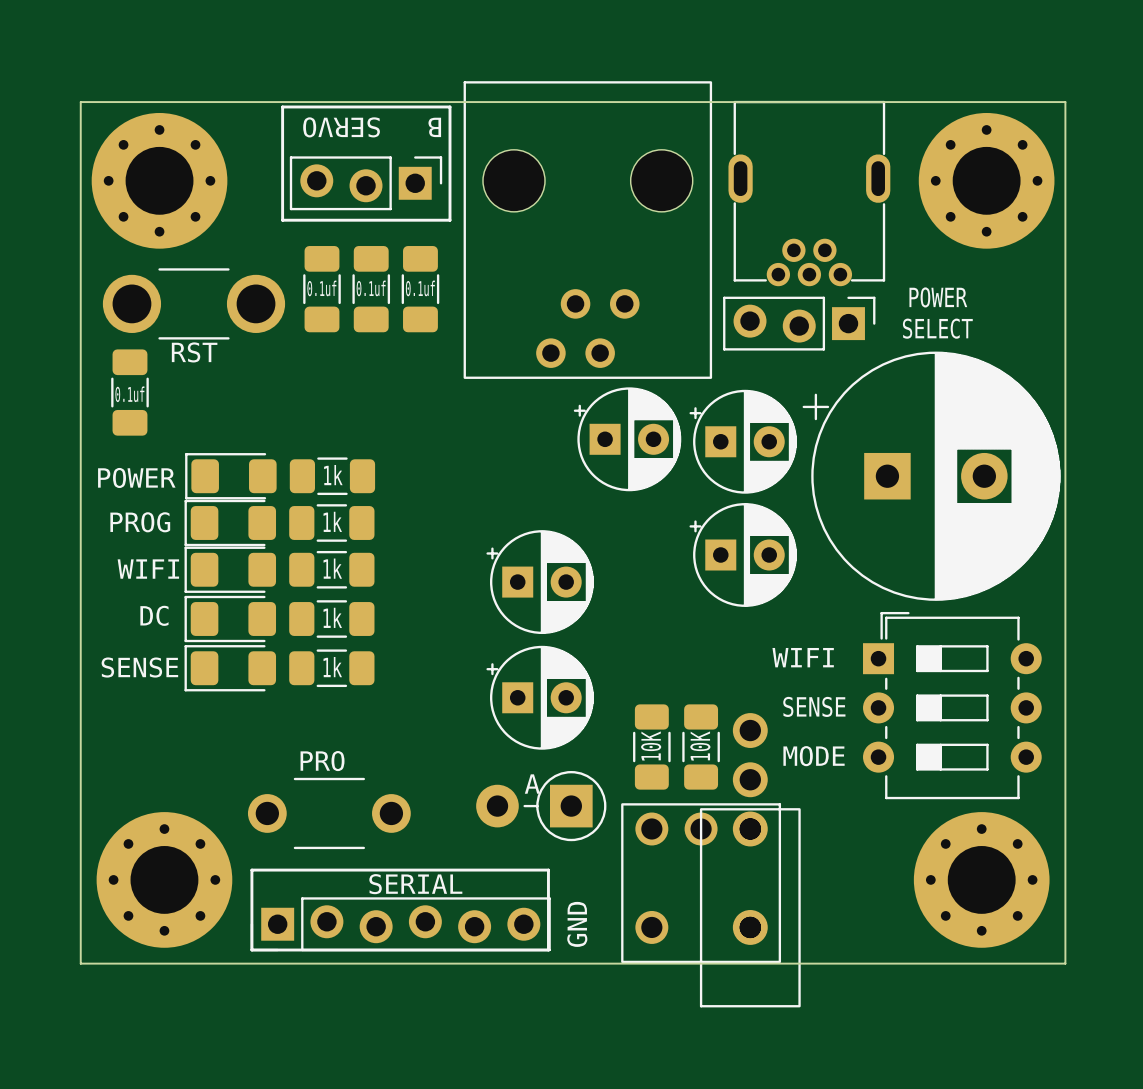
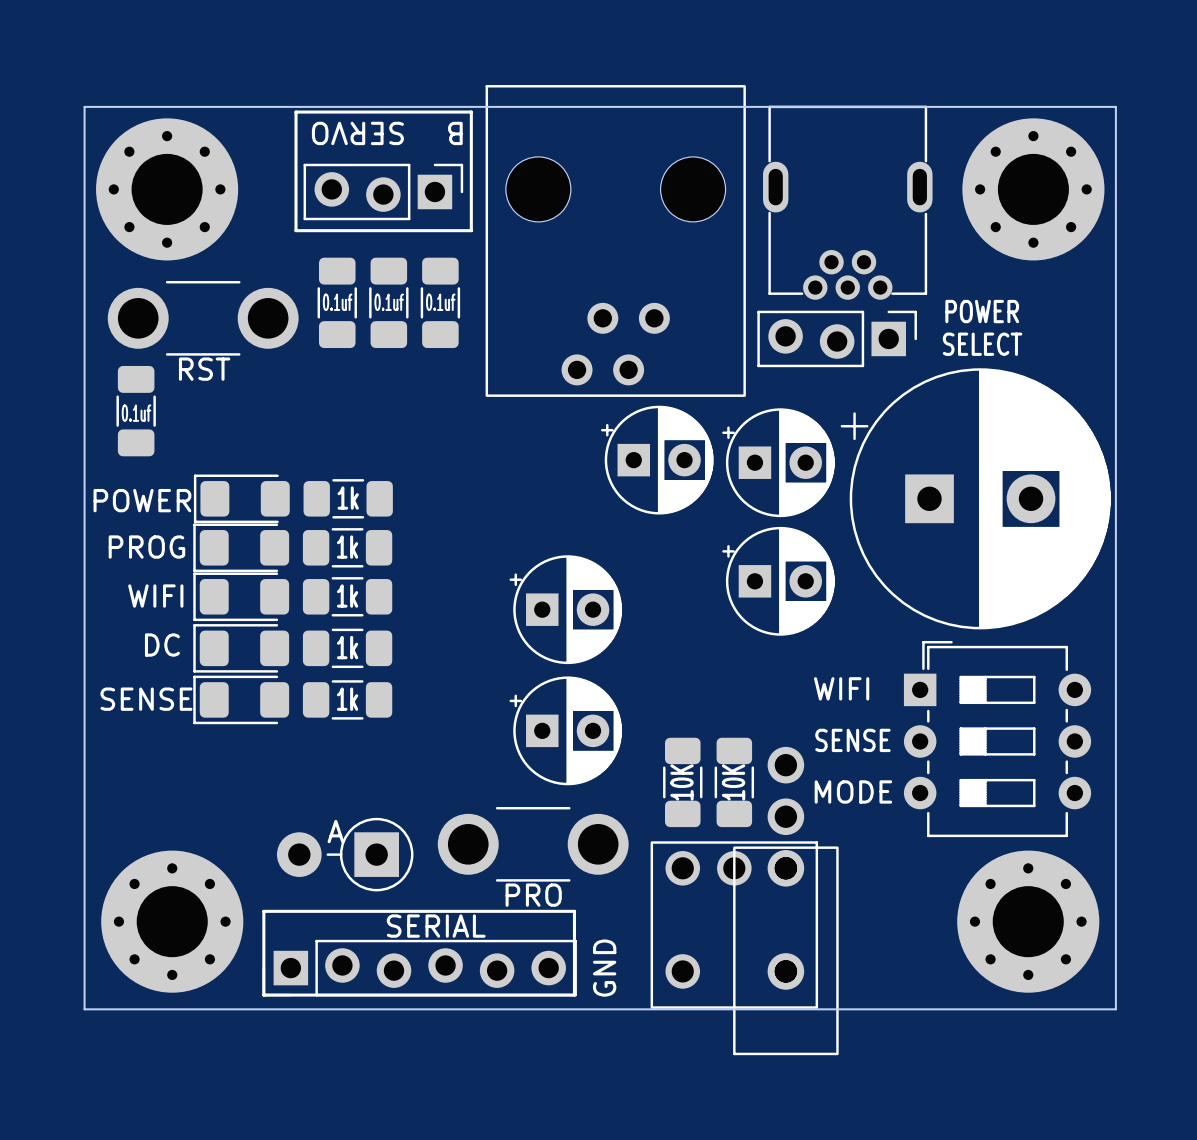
text position: PRO (322, 761) -> PRO (533, 895)
part footprint: [247, 777, 411, 850] -> [276, 817, 414, 892]
part: none -> (533, 844)
part: (541, 806) -> none

